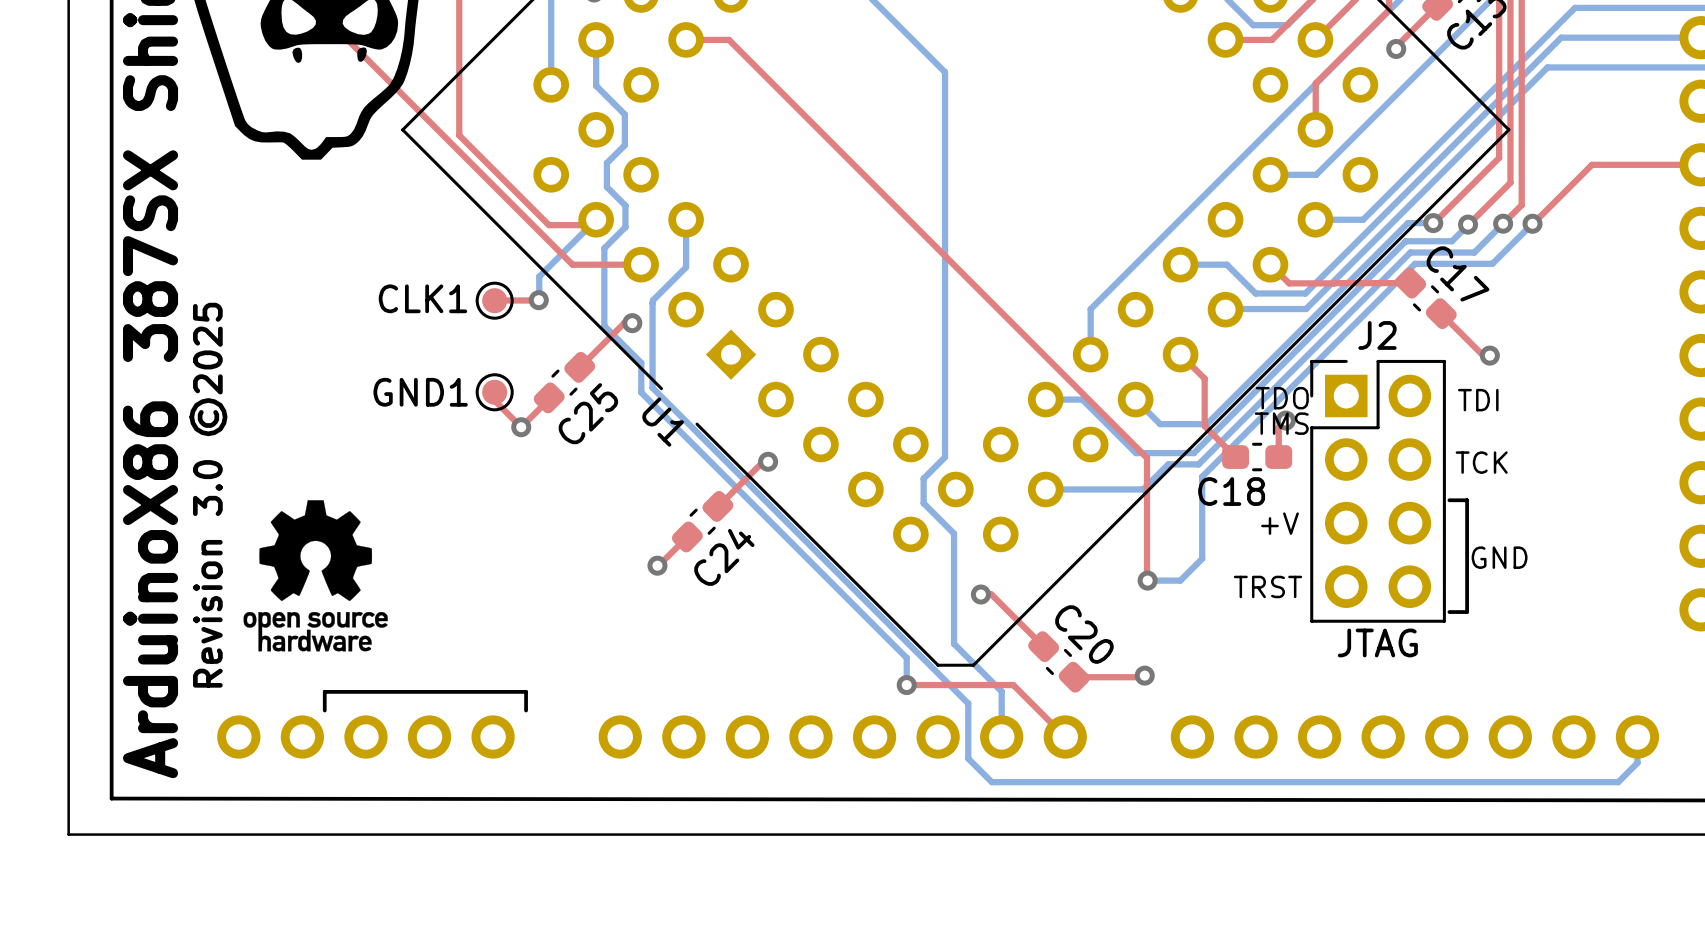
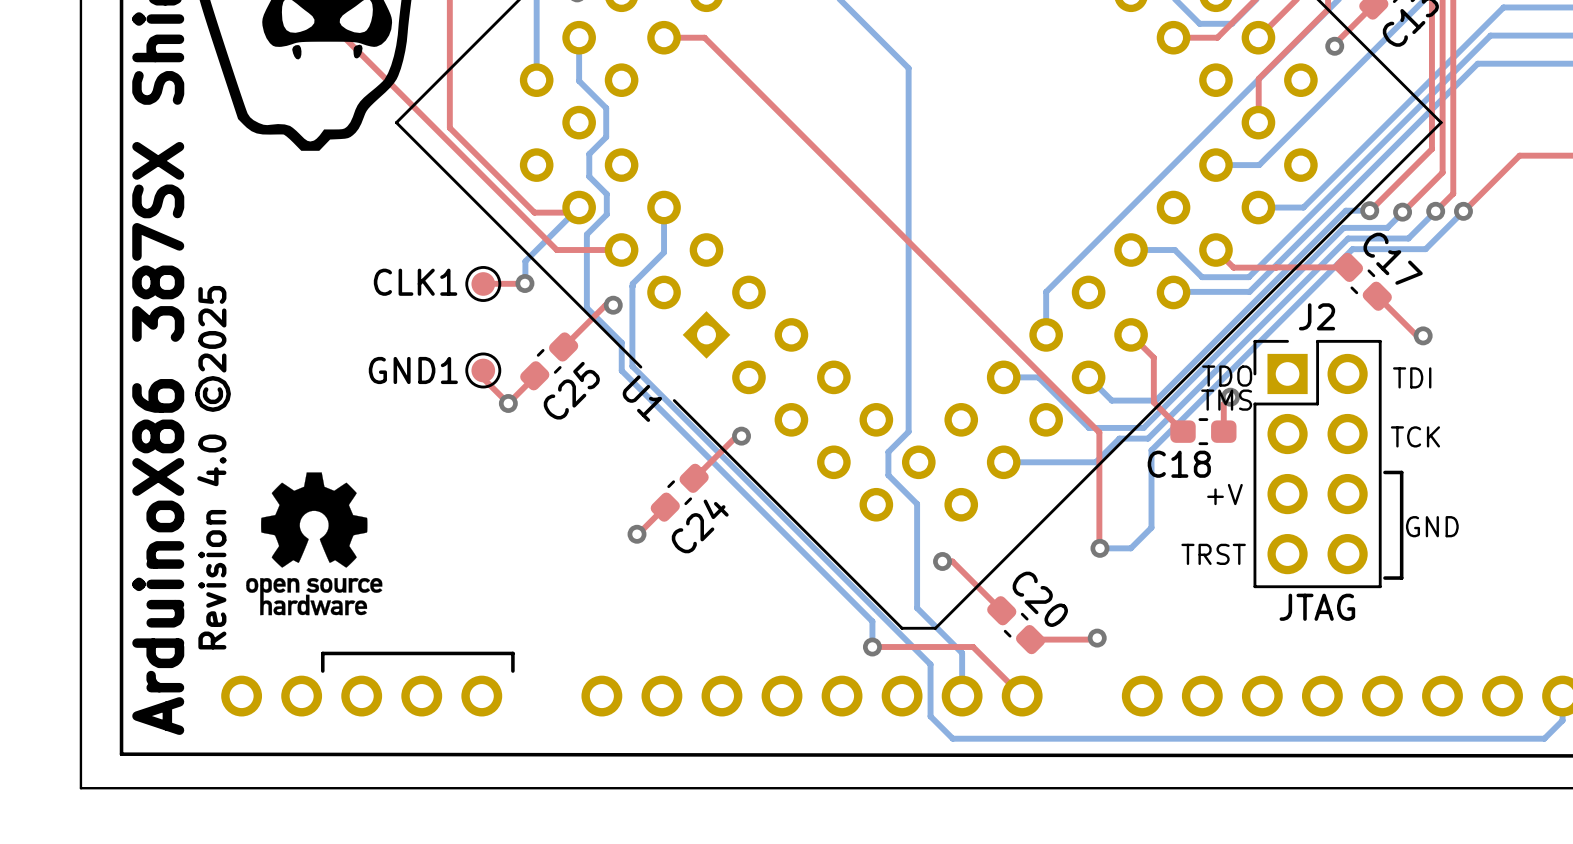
text: Revision 3.0 ©2025 (208, 495) -> Revision 4.0 ©2025 (212, 467)

